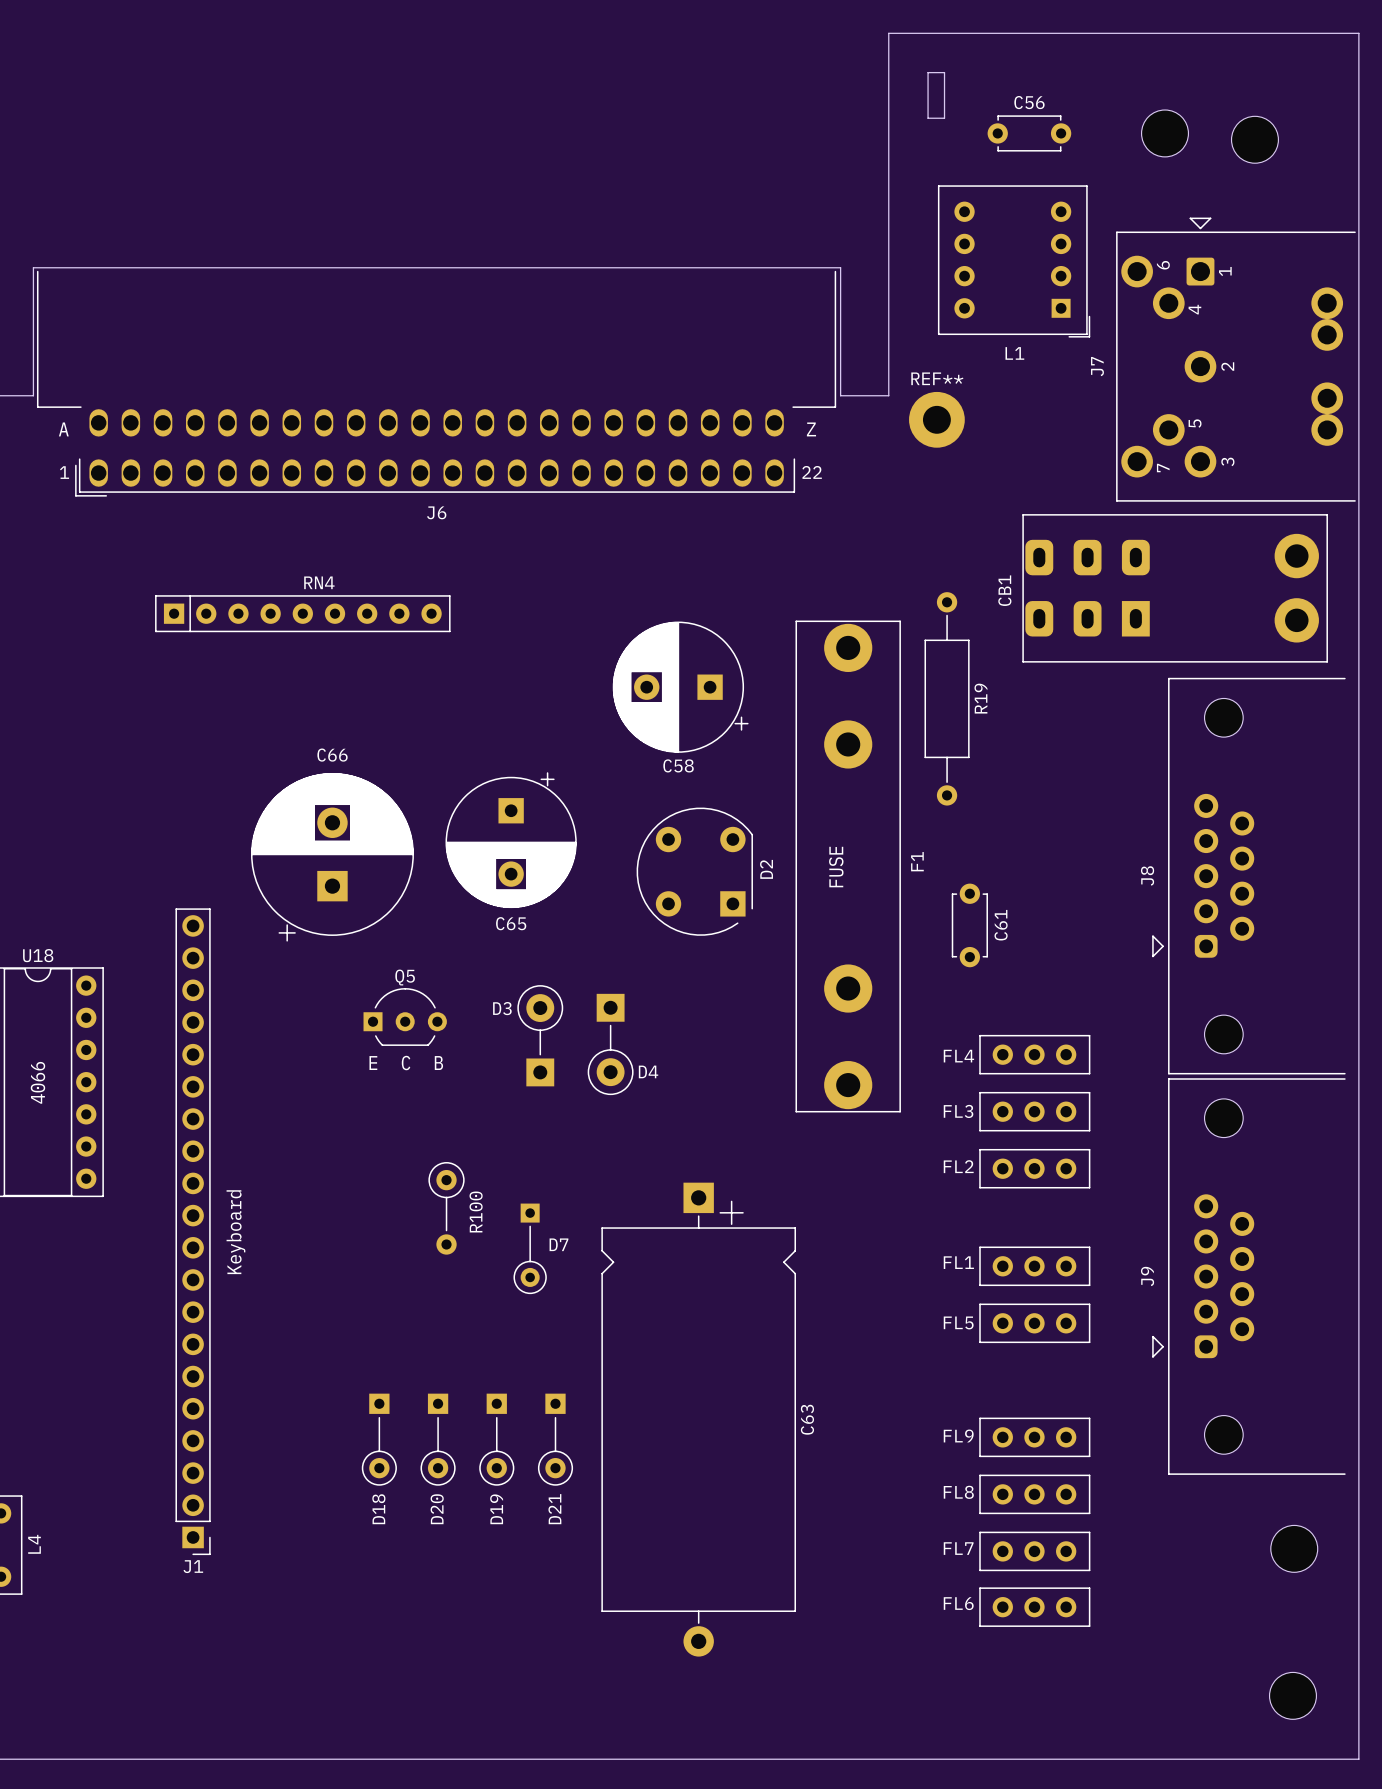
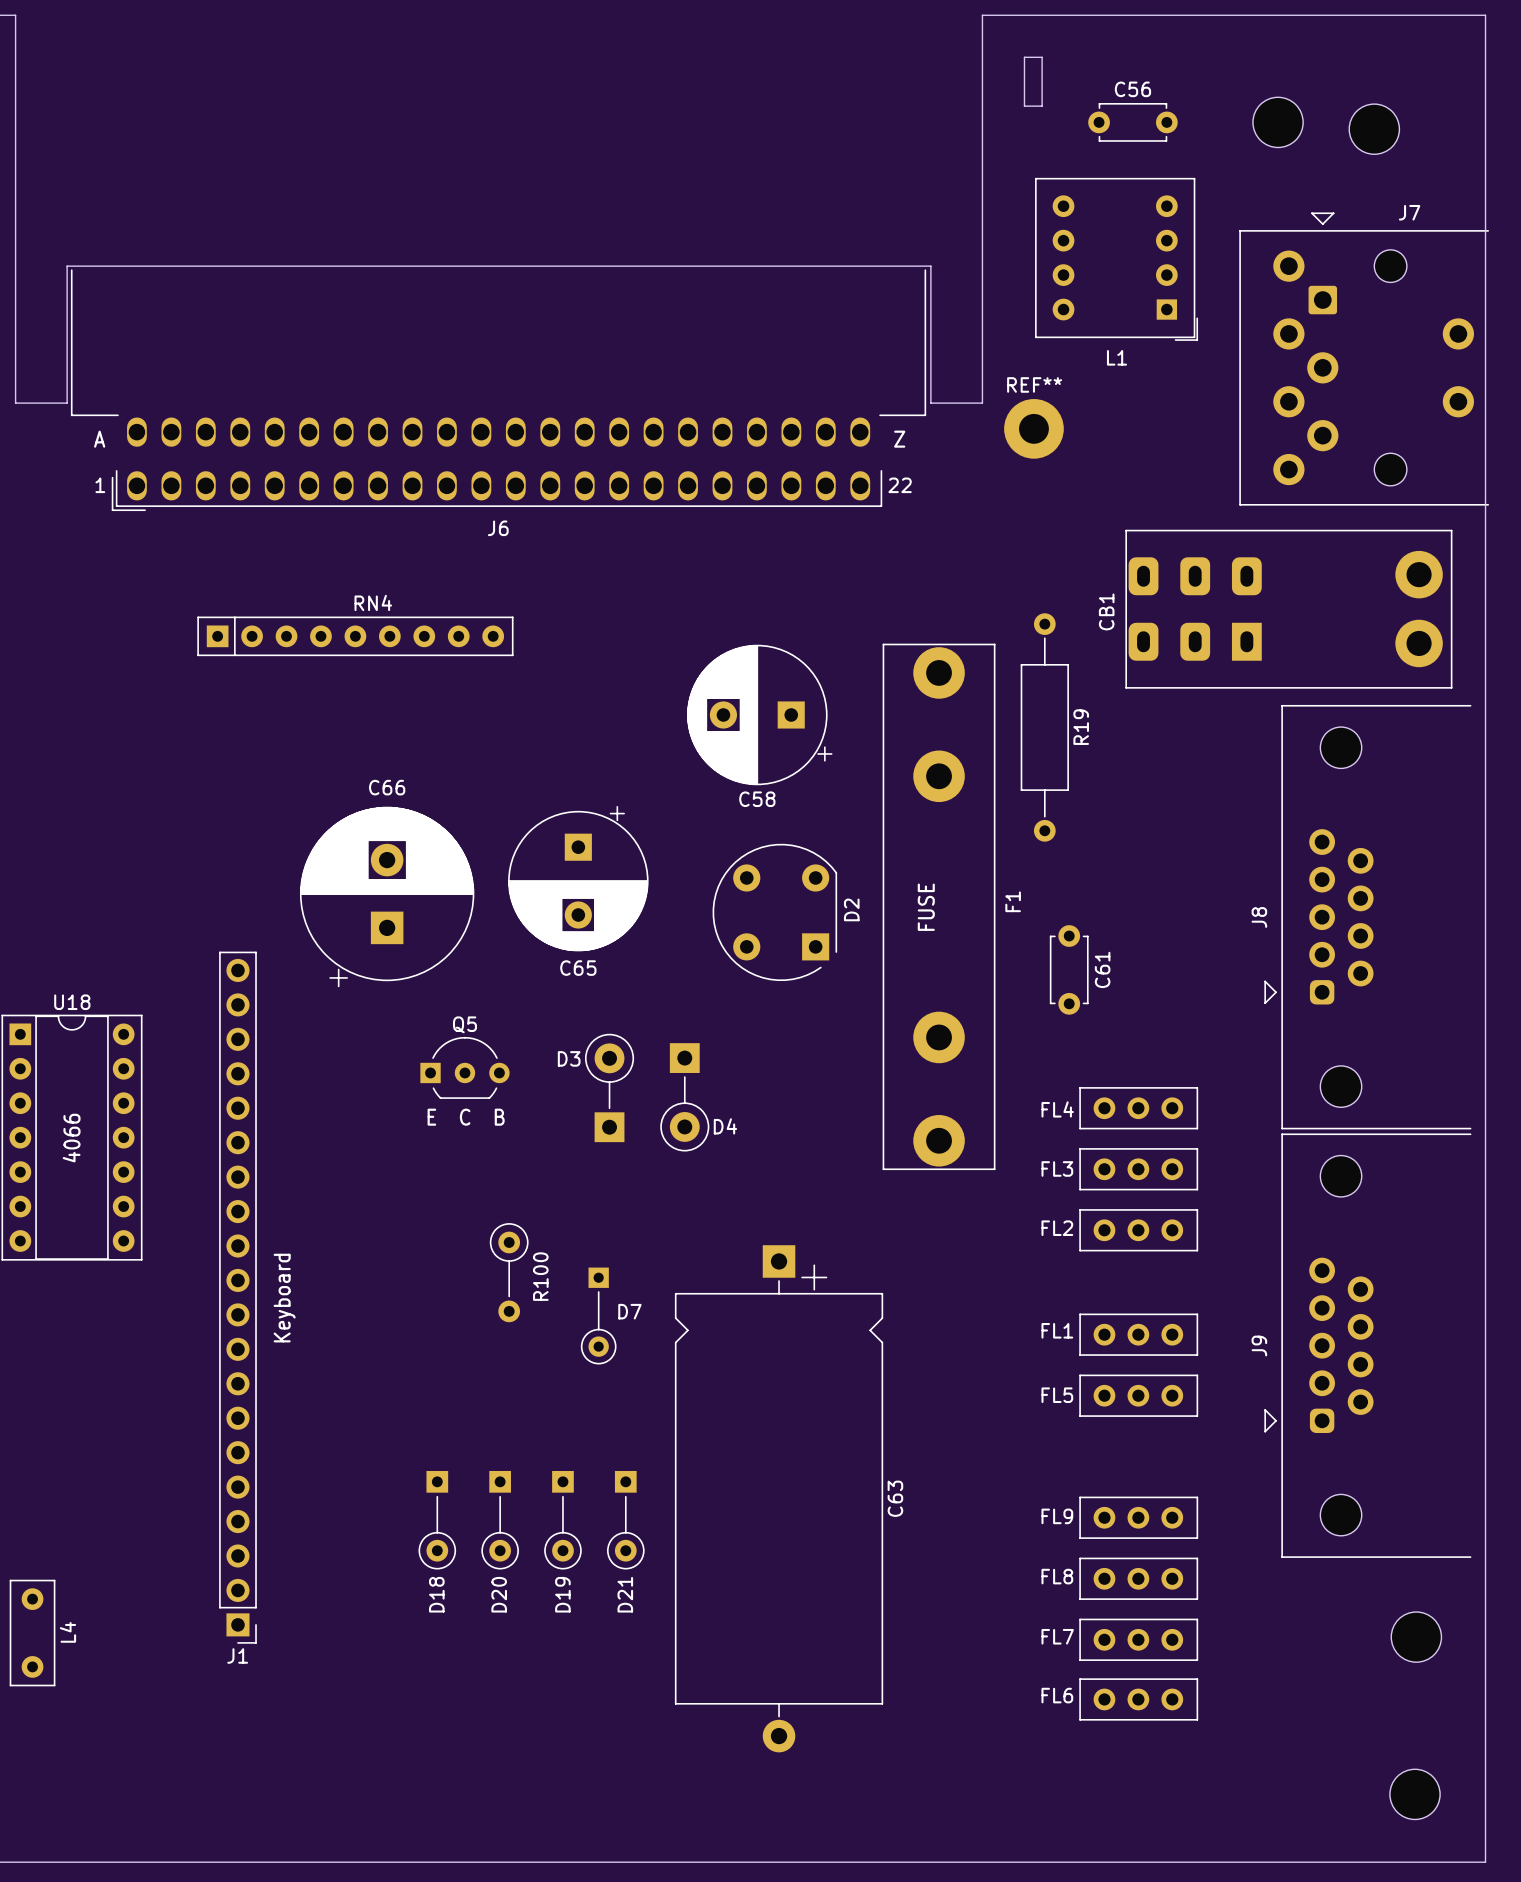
J7 footprint: [1116, 217, 1356, 502] -> [1239, 212, 1490, 506]
J7 name position: J7 (1097, 366) -> J7 (1409, 212)

